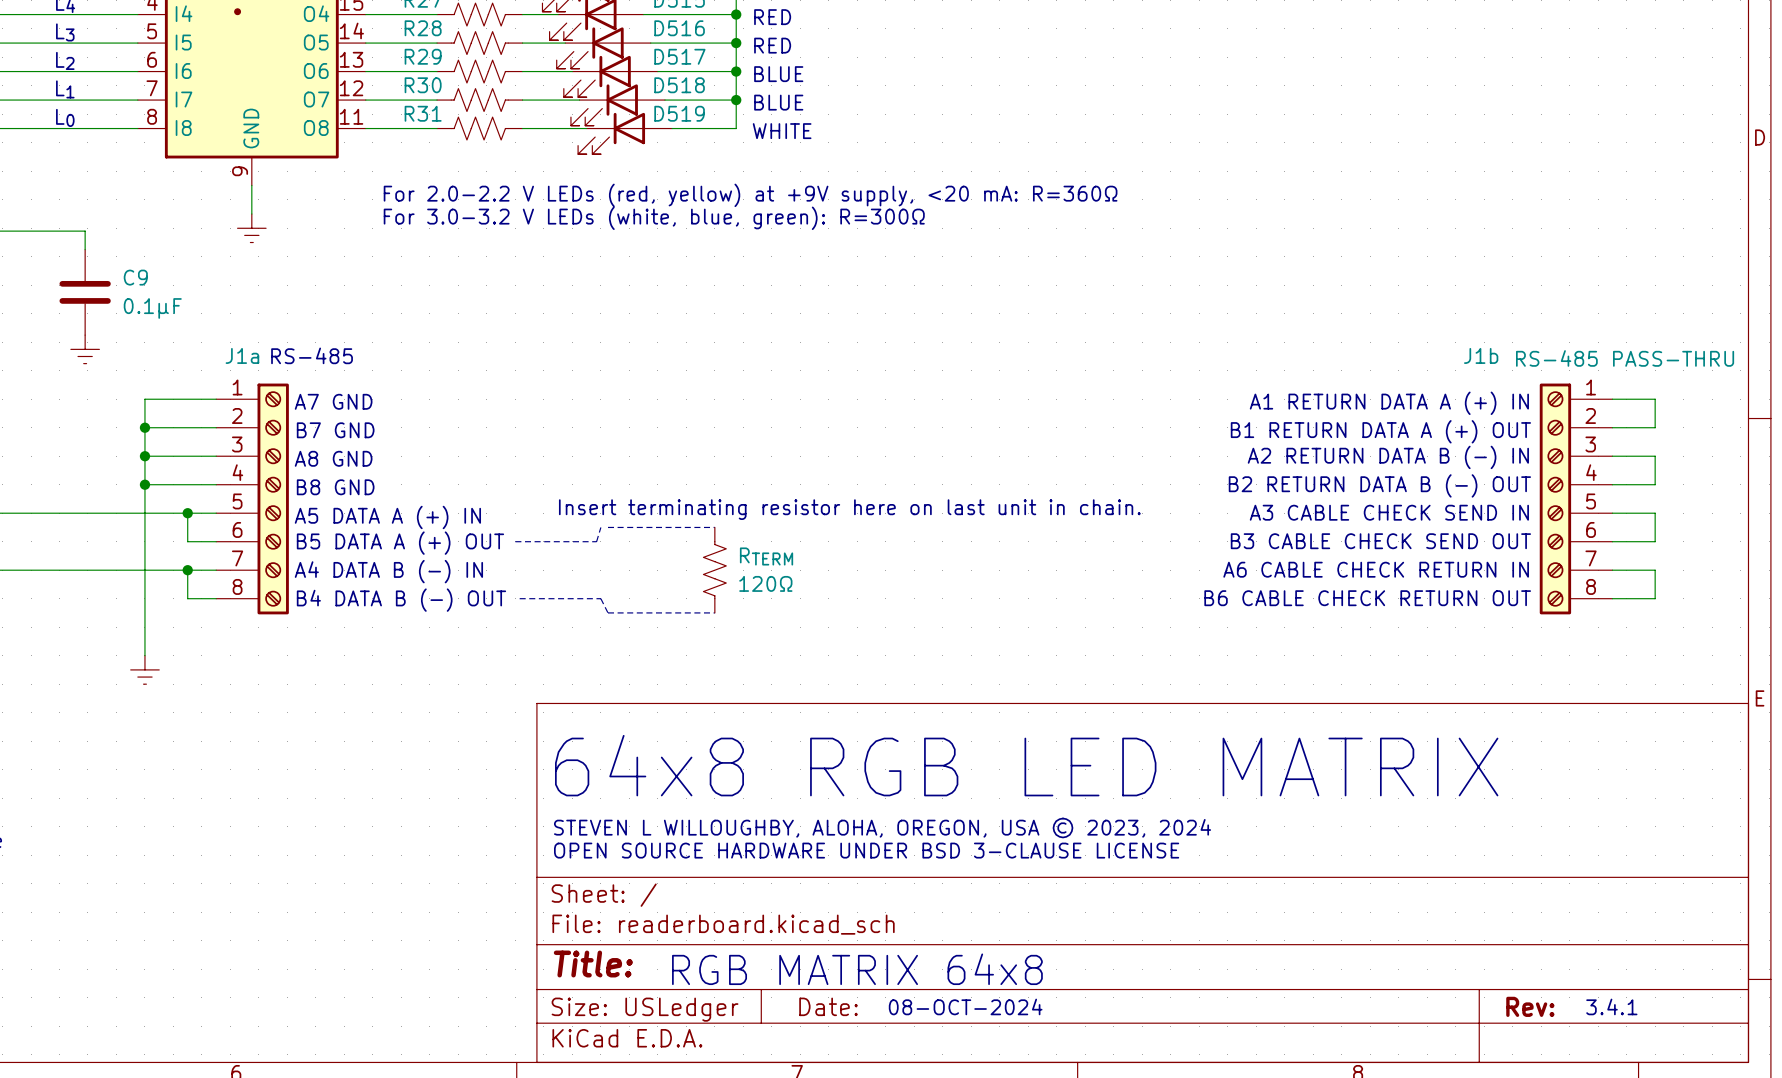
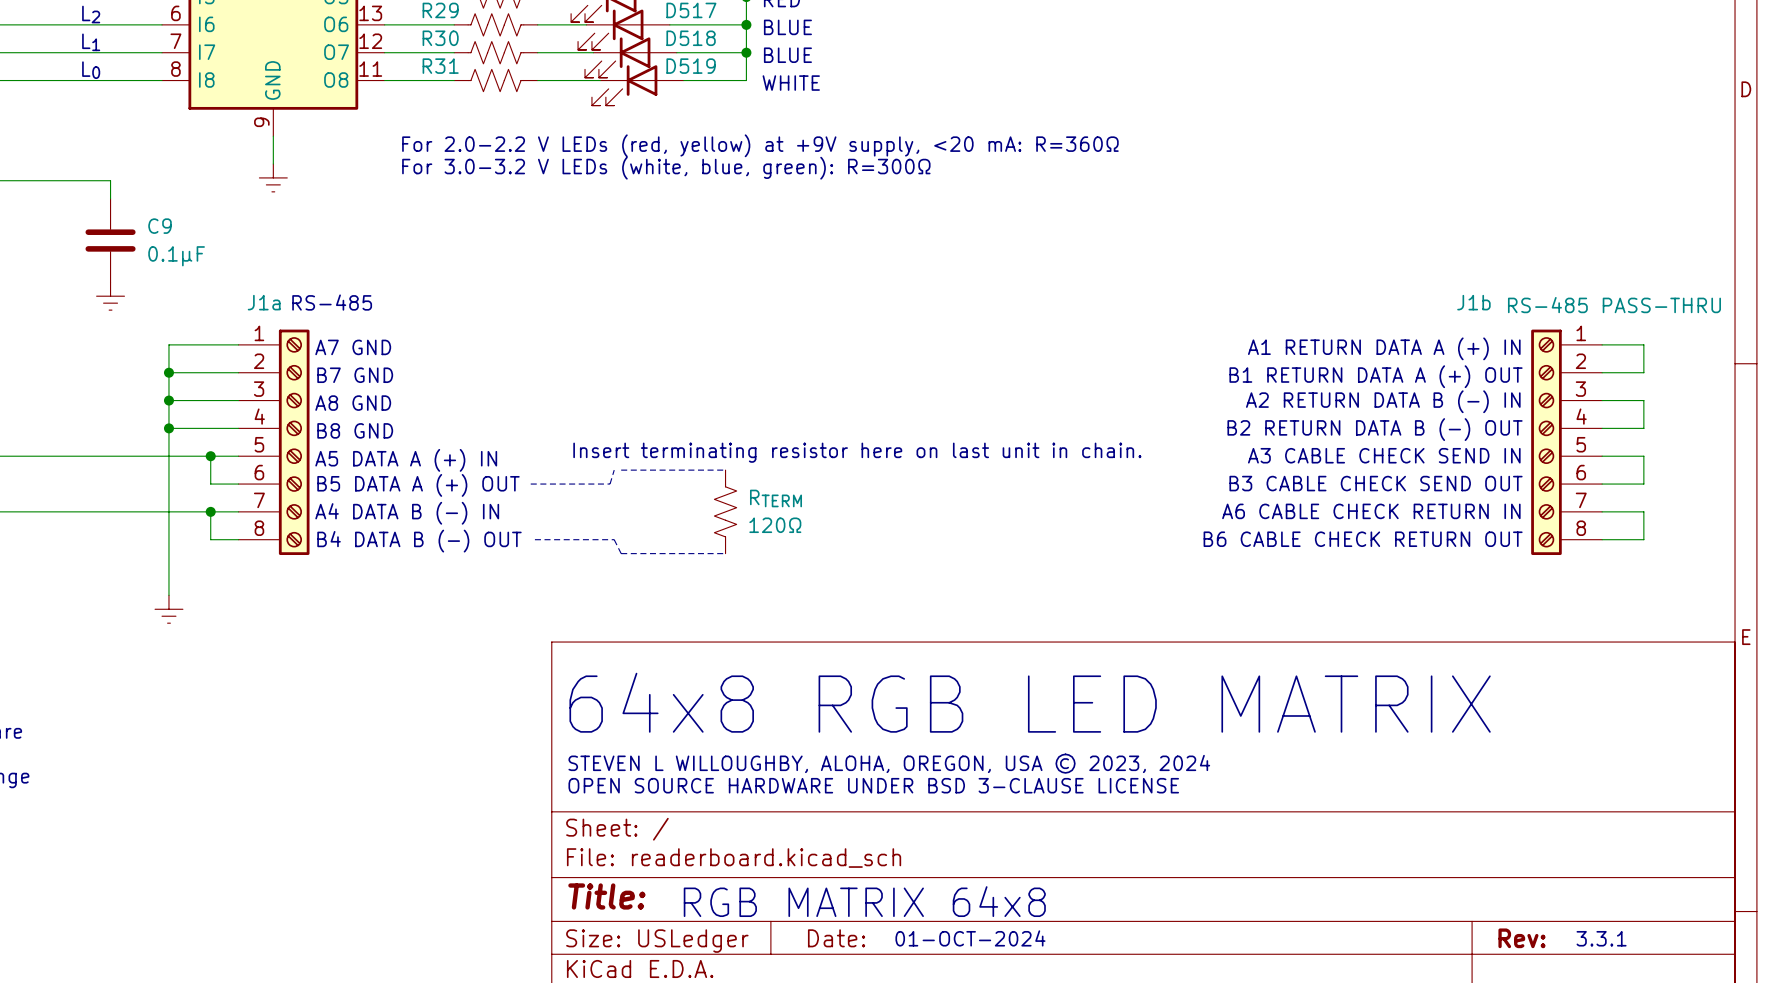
text: 08-OCT-2024 (965, 1006) -> 01-OCT-2024 (970, 938)
text: 3.4.1 (1611, 1006) -> 3.3.1 (1601, 938)

